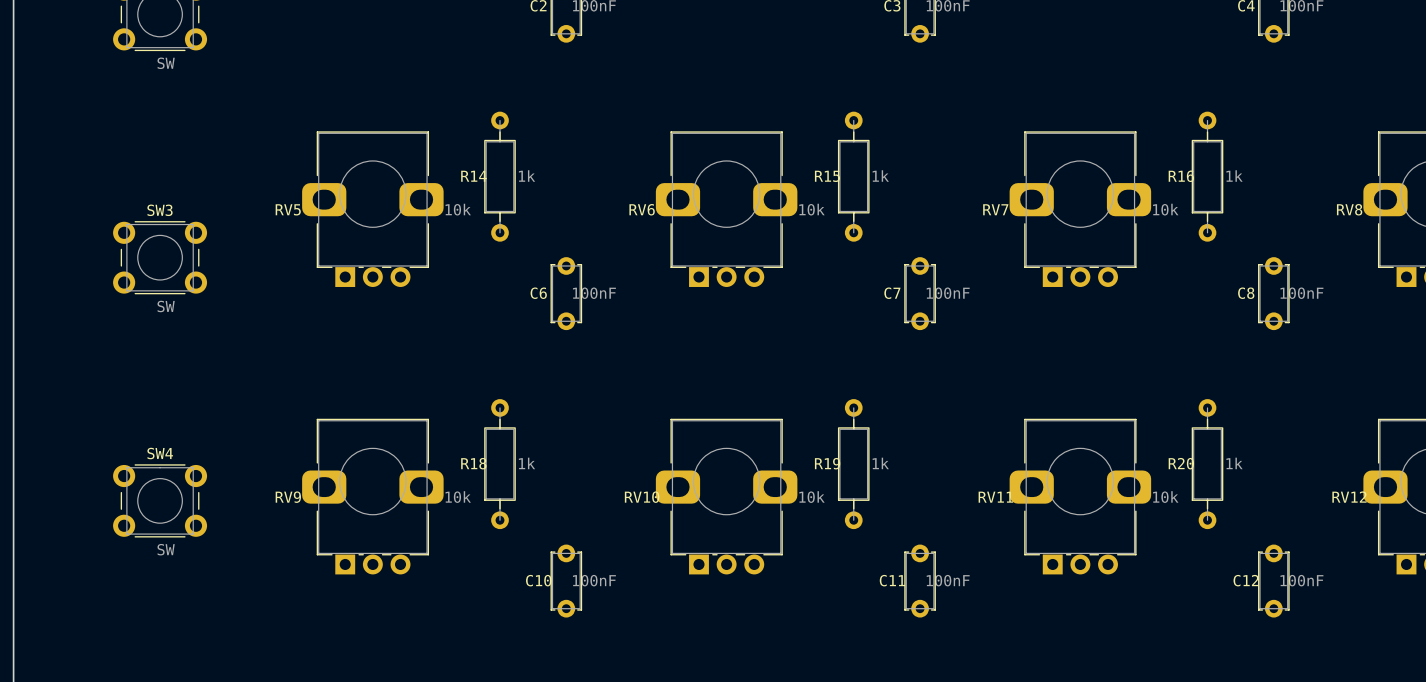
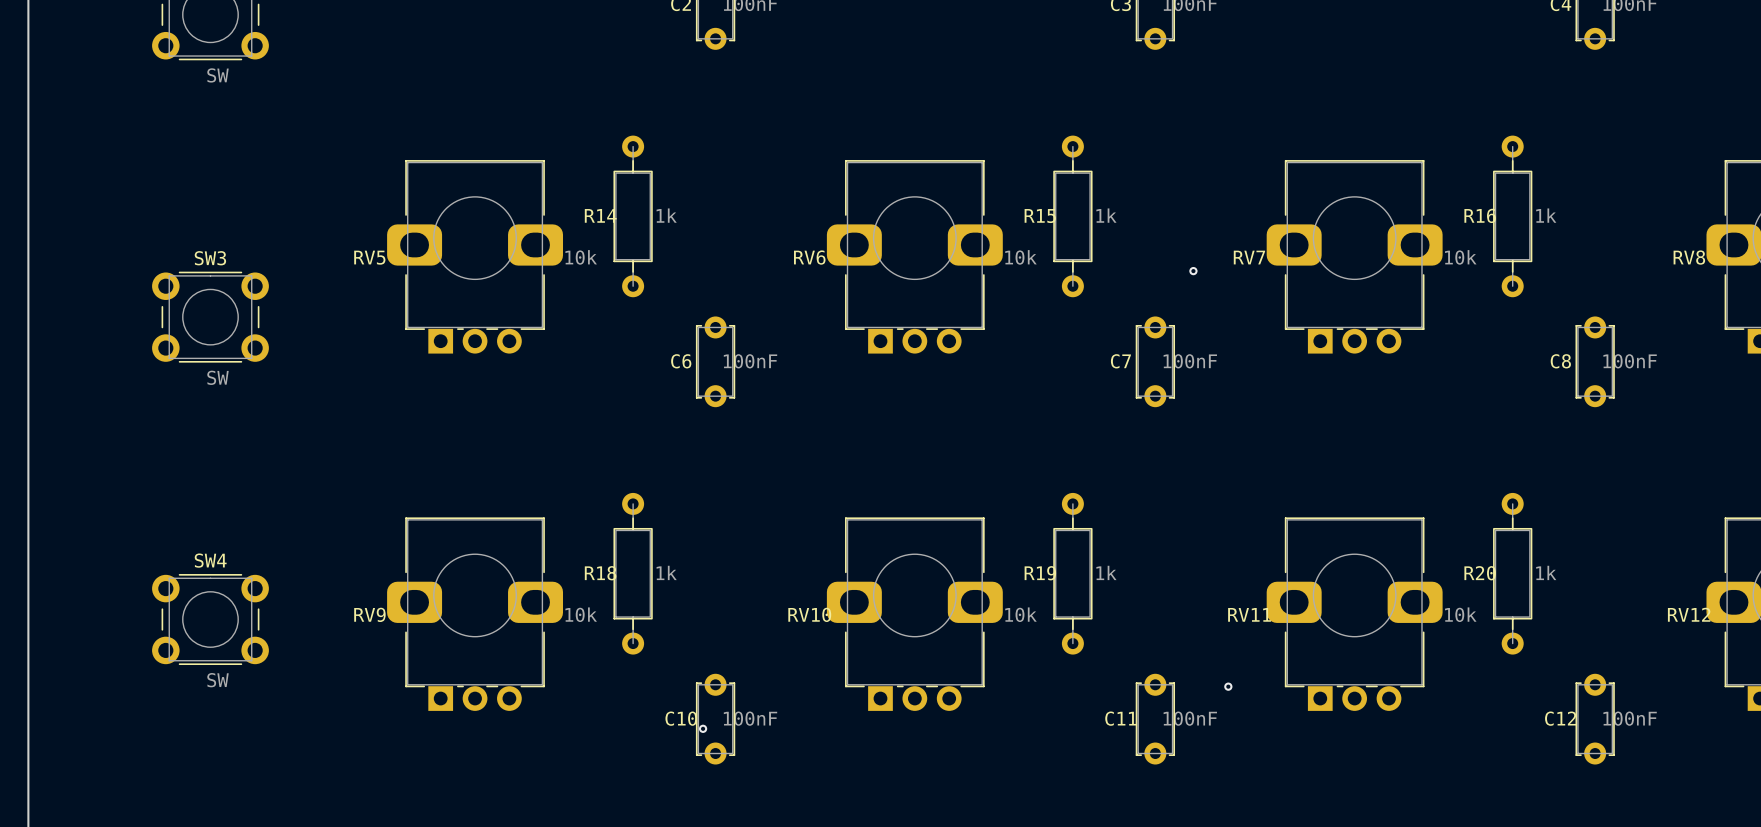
via: none -> (1193, 271)
via: none -> (1228, 686)
via: none -> (703, 728)

